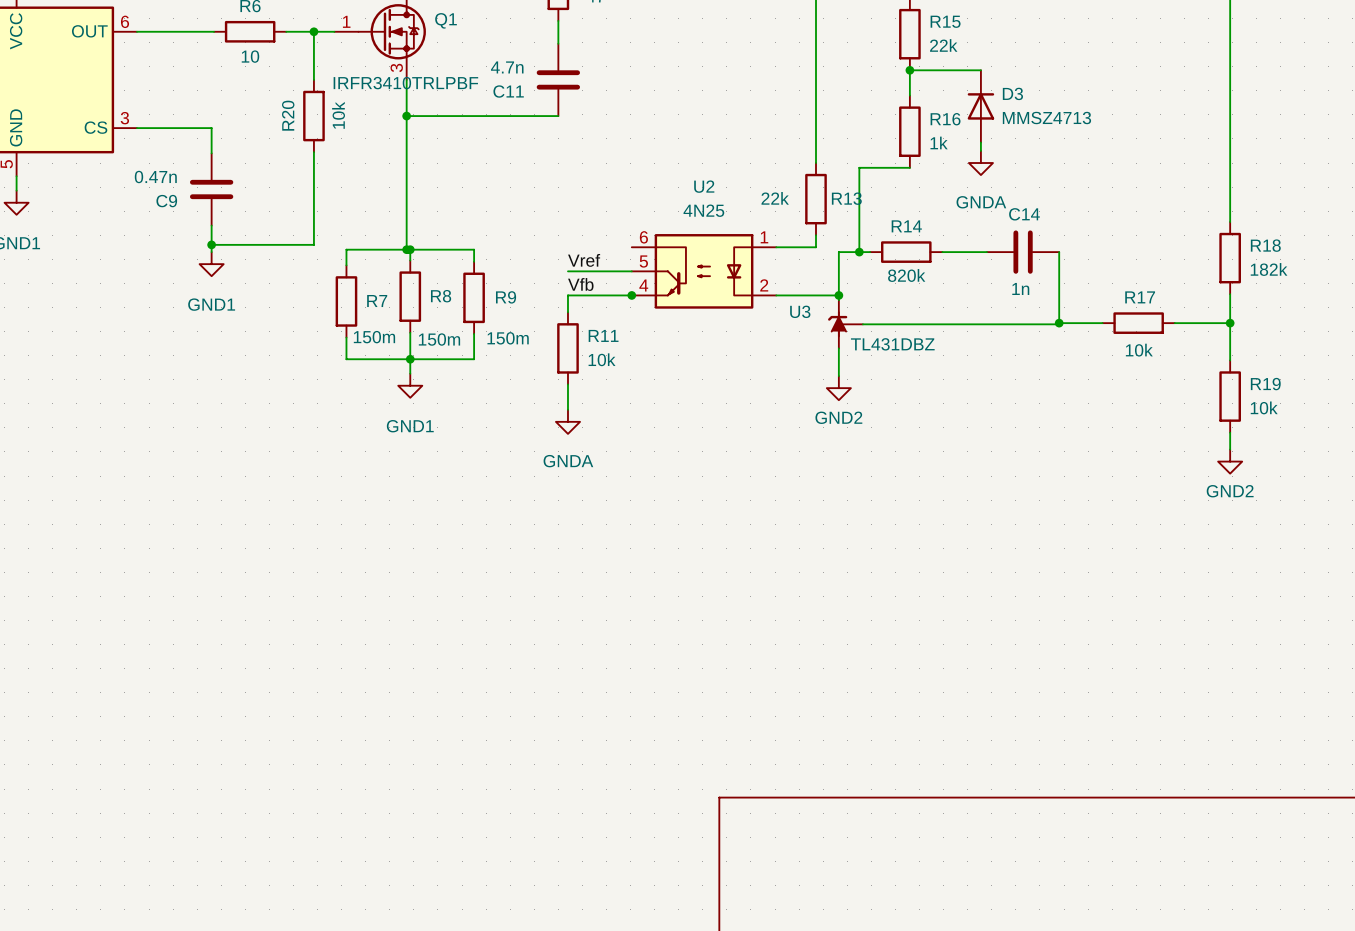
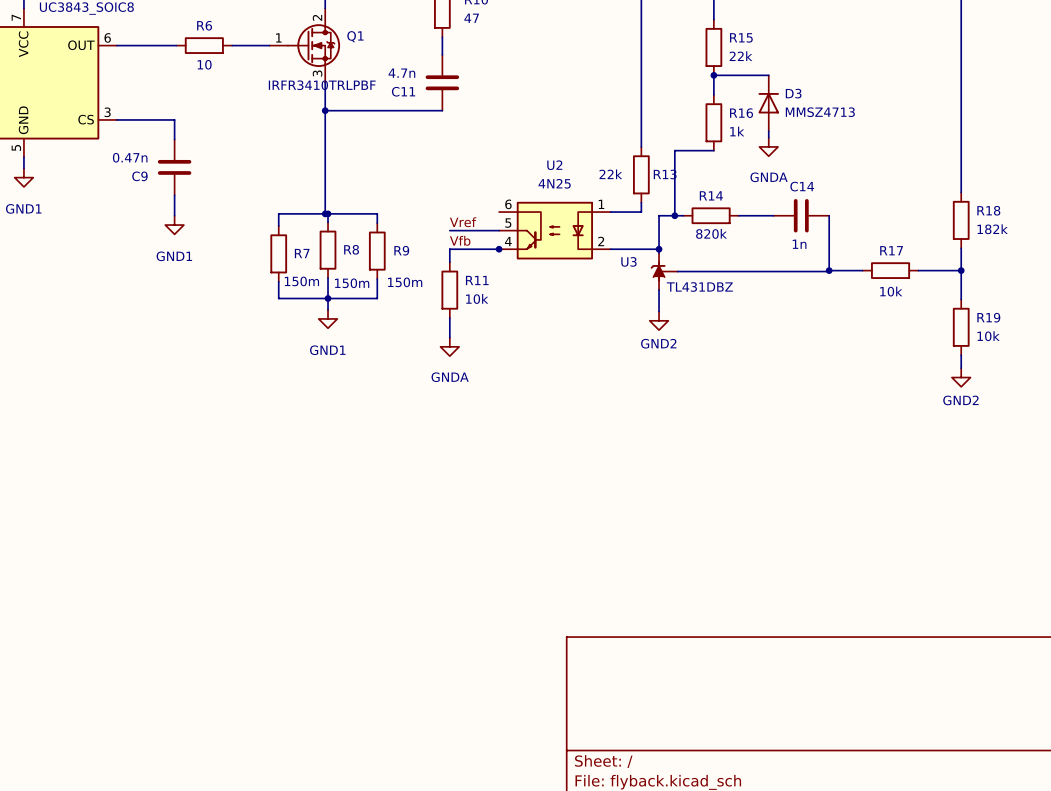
wire: (313, 31) (313, 79) -> none
junction: (313, 31) -> none
R20: 10k (313, 116) -> none
wire: (313, 152) (313, 244) (211, 244) -> none
junction: (211, 244) -> none

